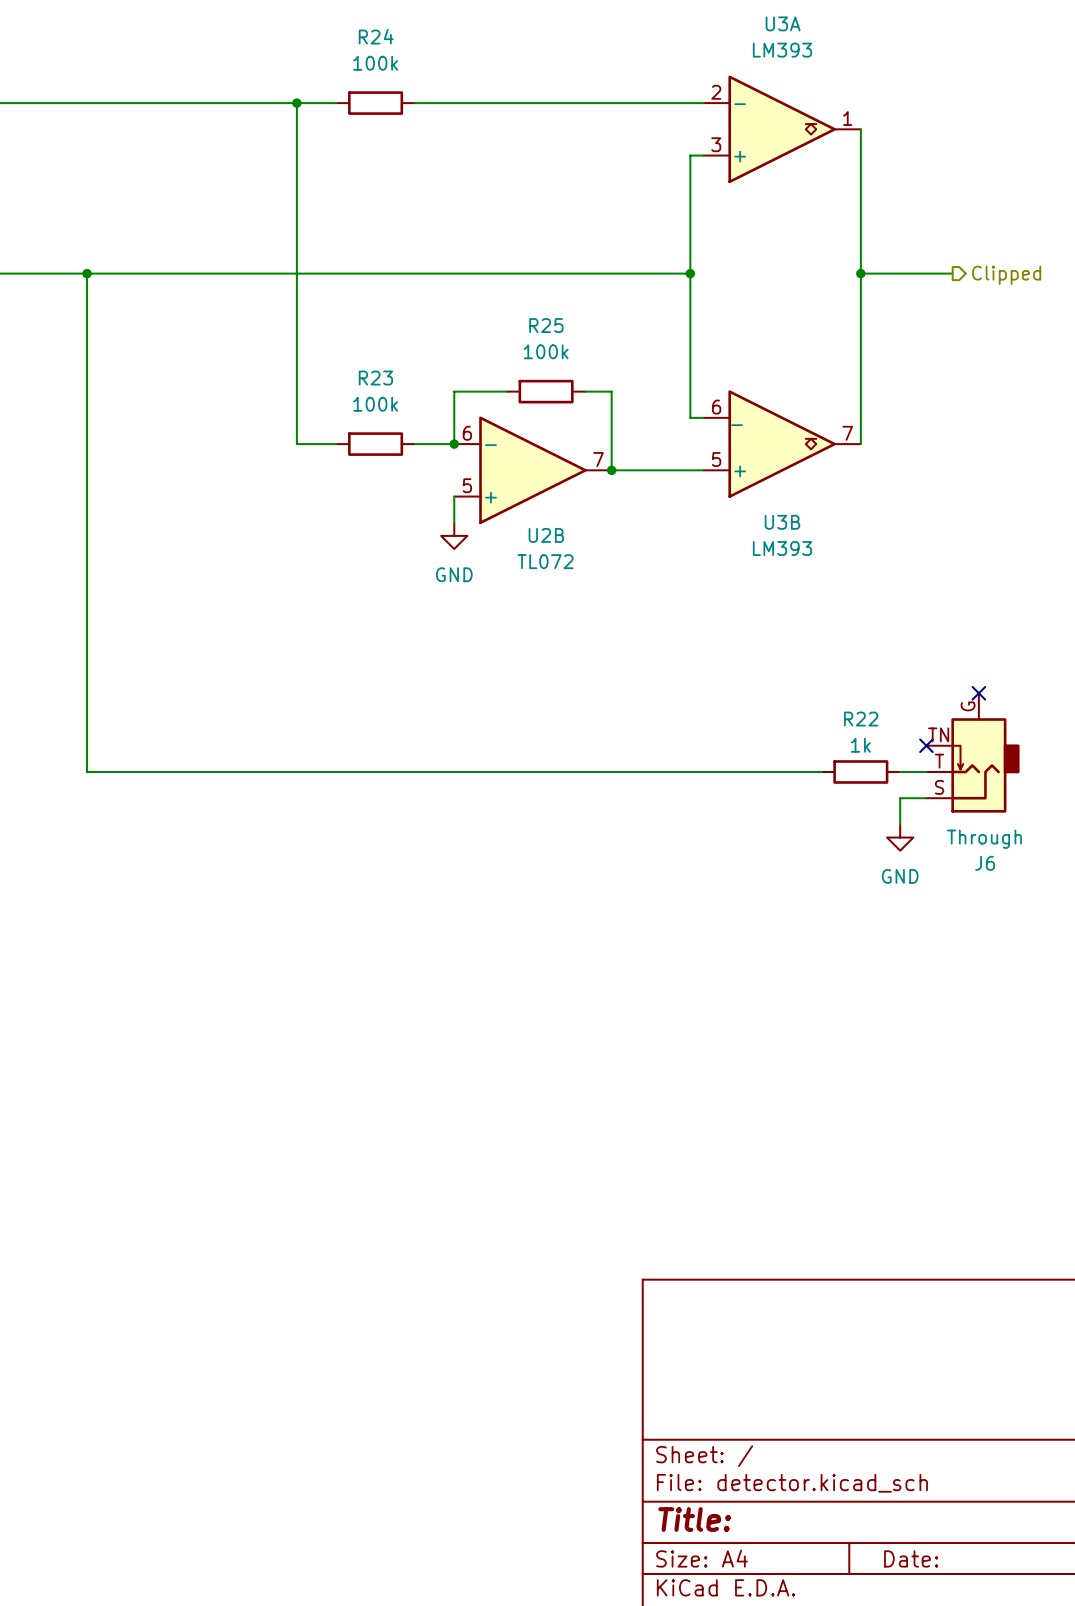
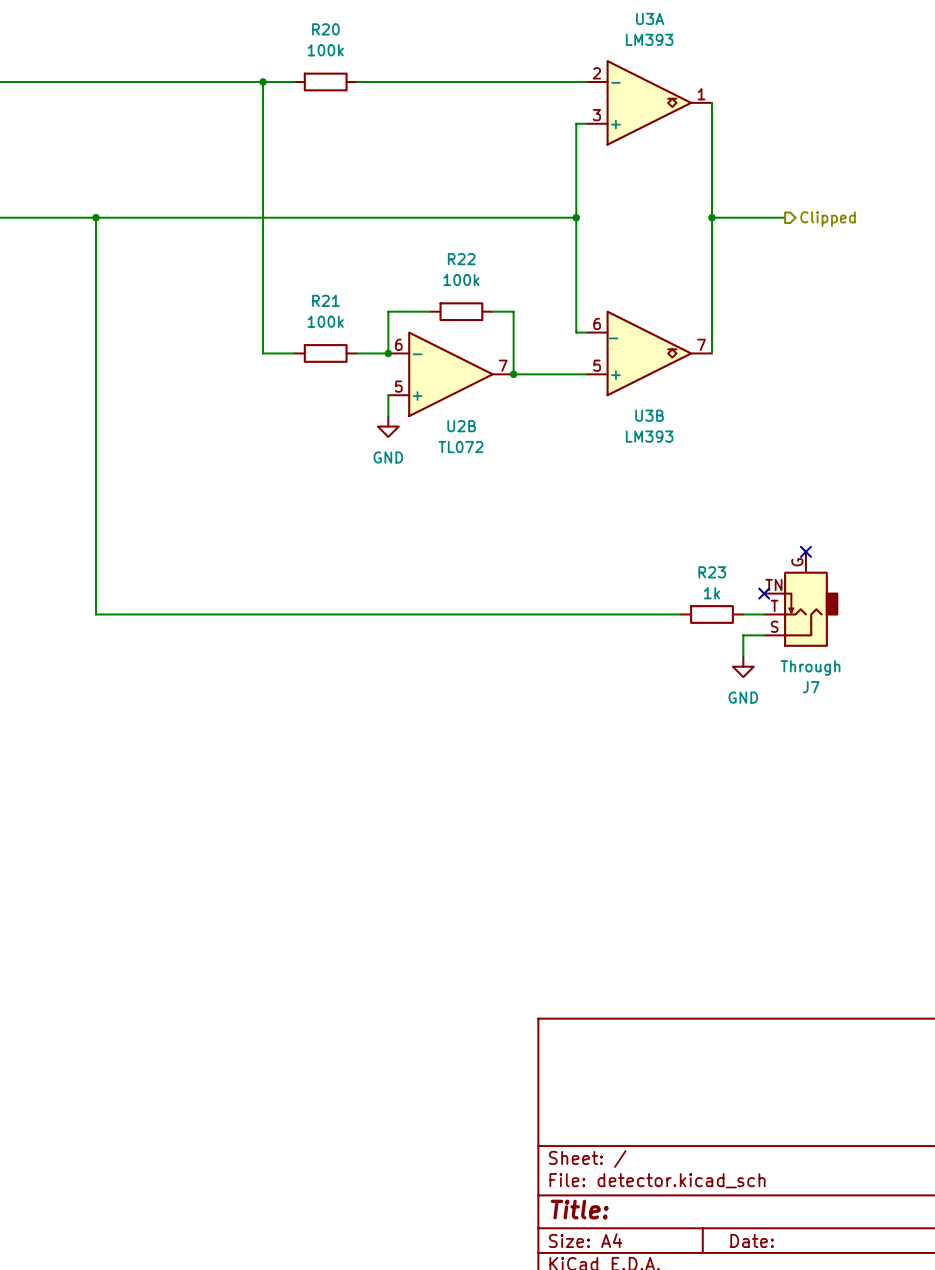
R24 name: R24 (376, 36) -> R20 (325, 29)
R25 name: R25 (546, 325) -> R22 (461, 259)
R23 name: R23 (375, 378) -> R21 (325, 300)
R22 name: R22 (861, 719) -> R23 (712, 572)
J6 name: J6 (985, 863) -> J7 (811, 687)

